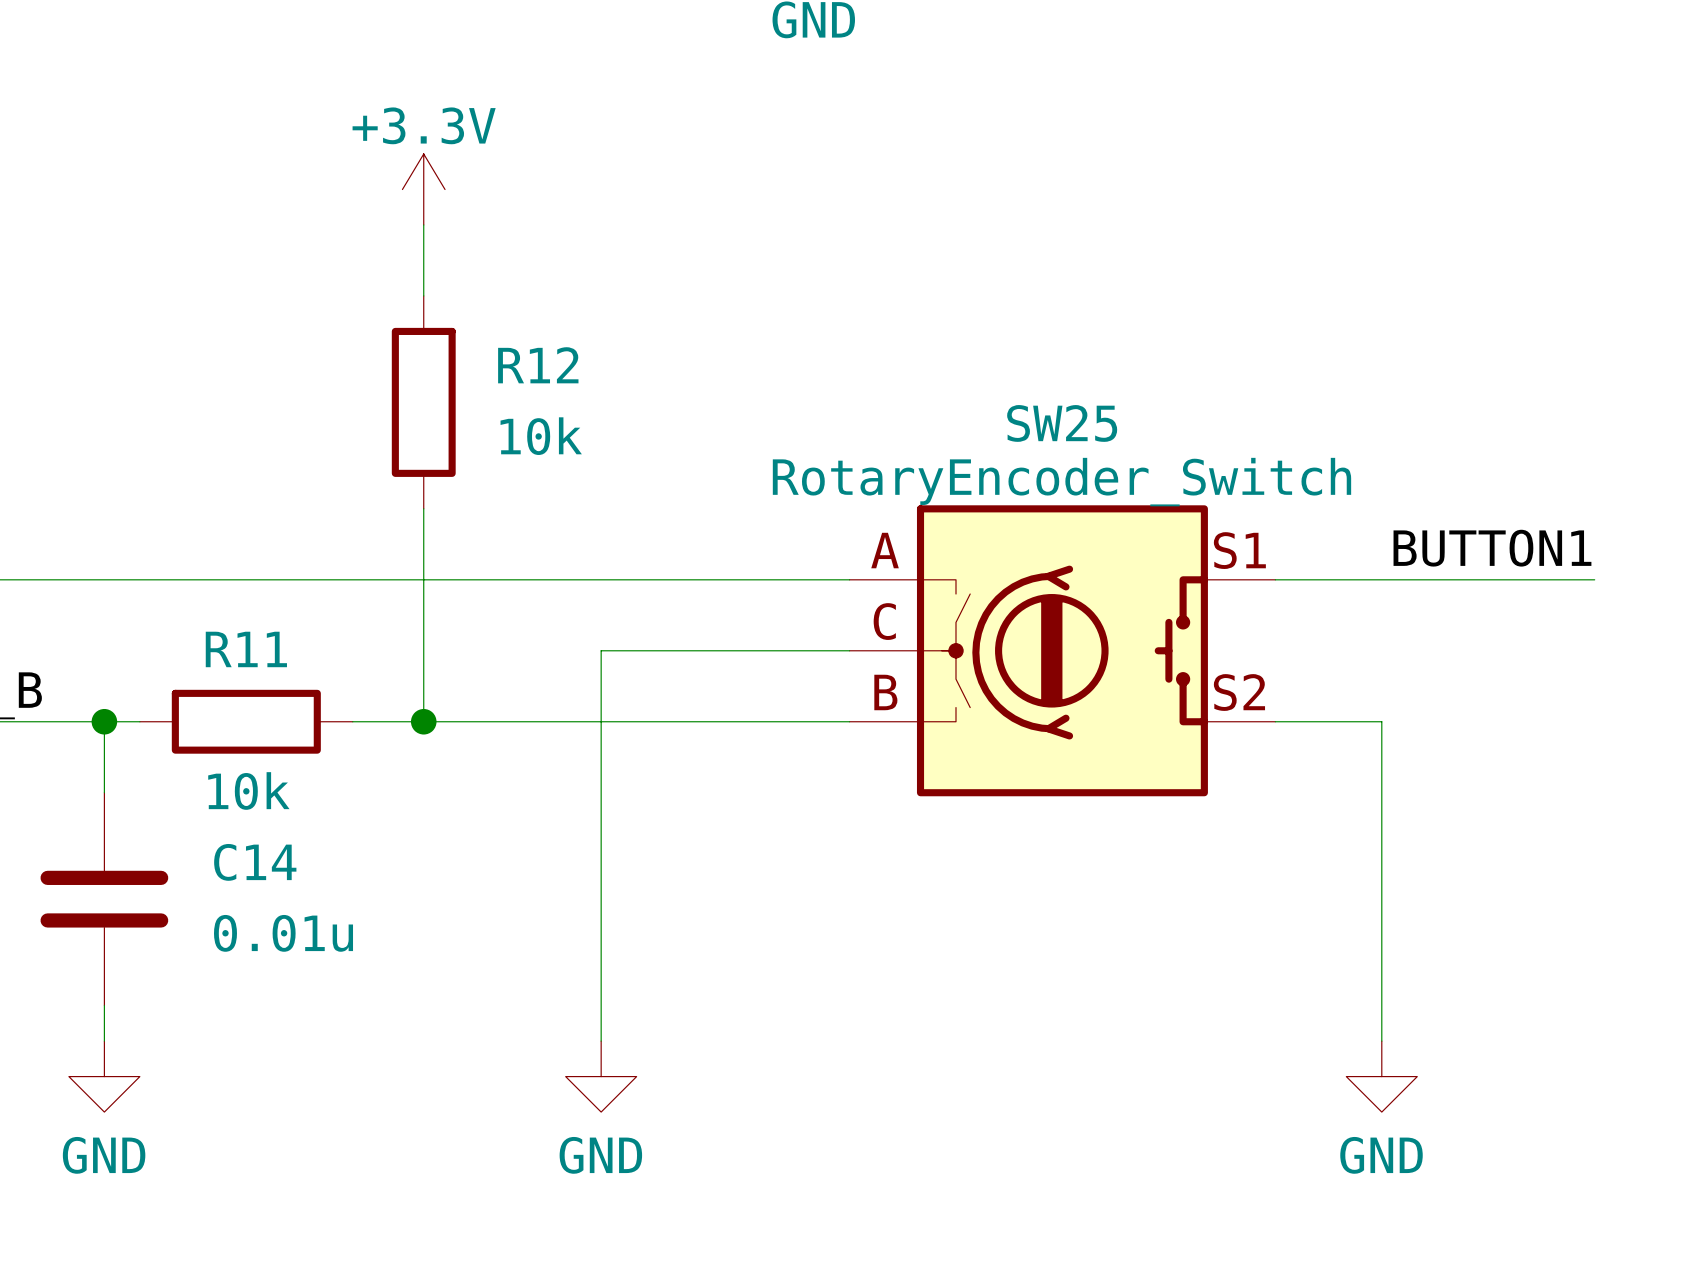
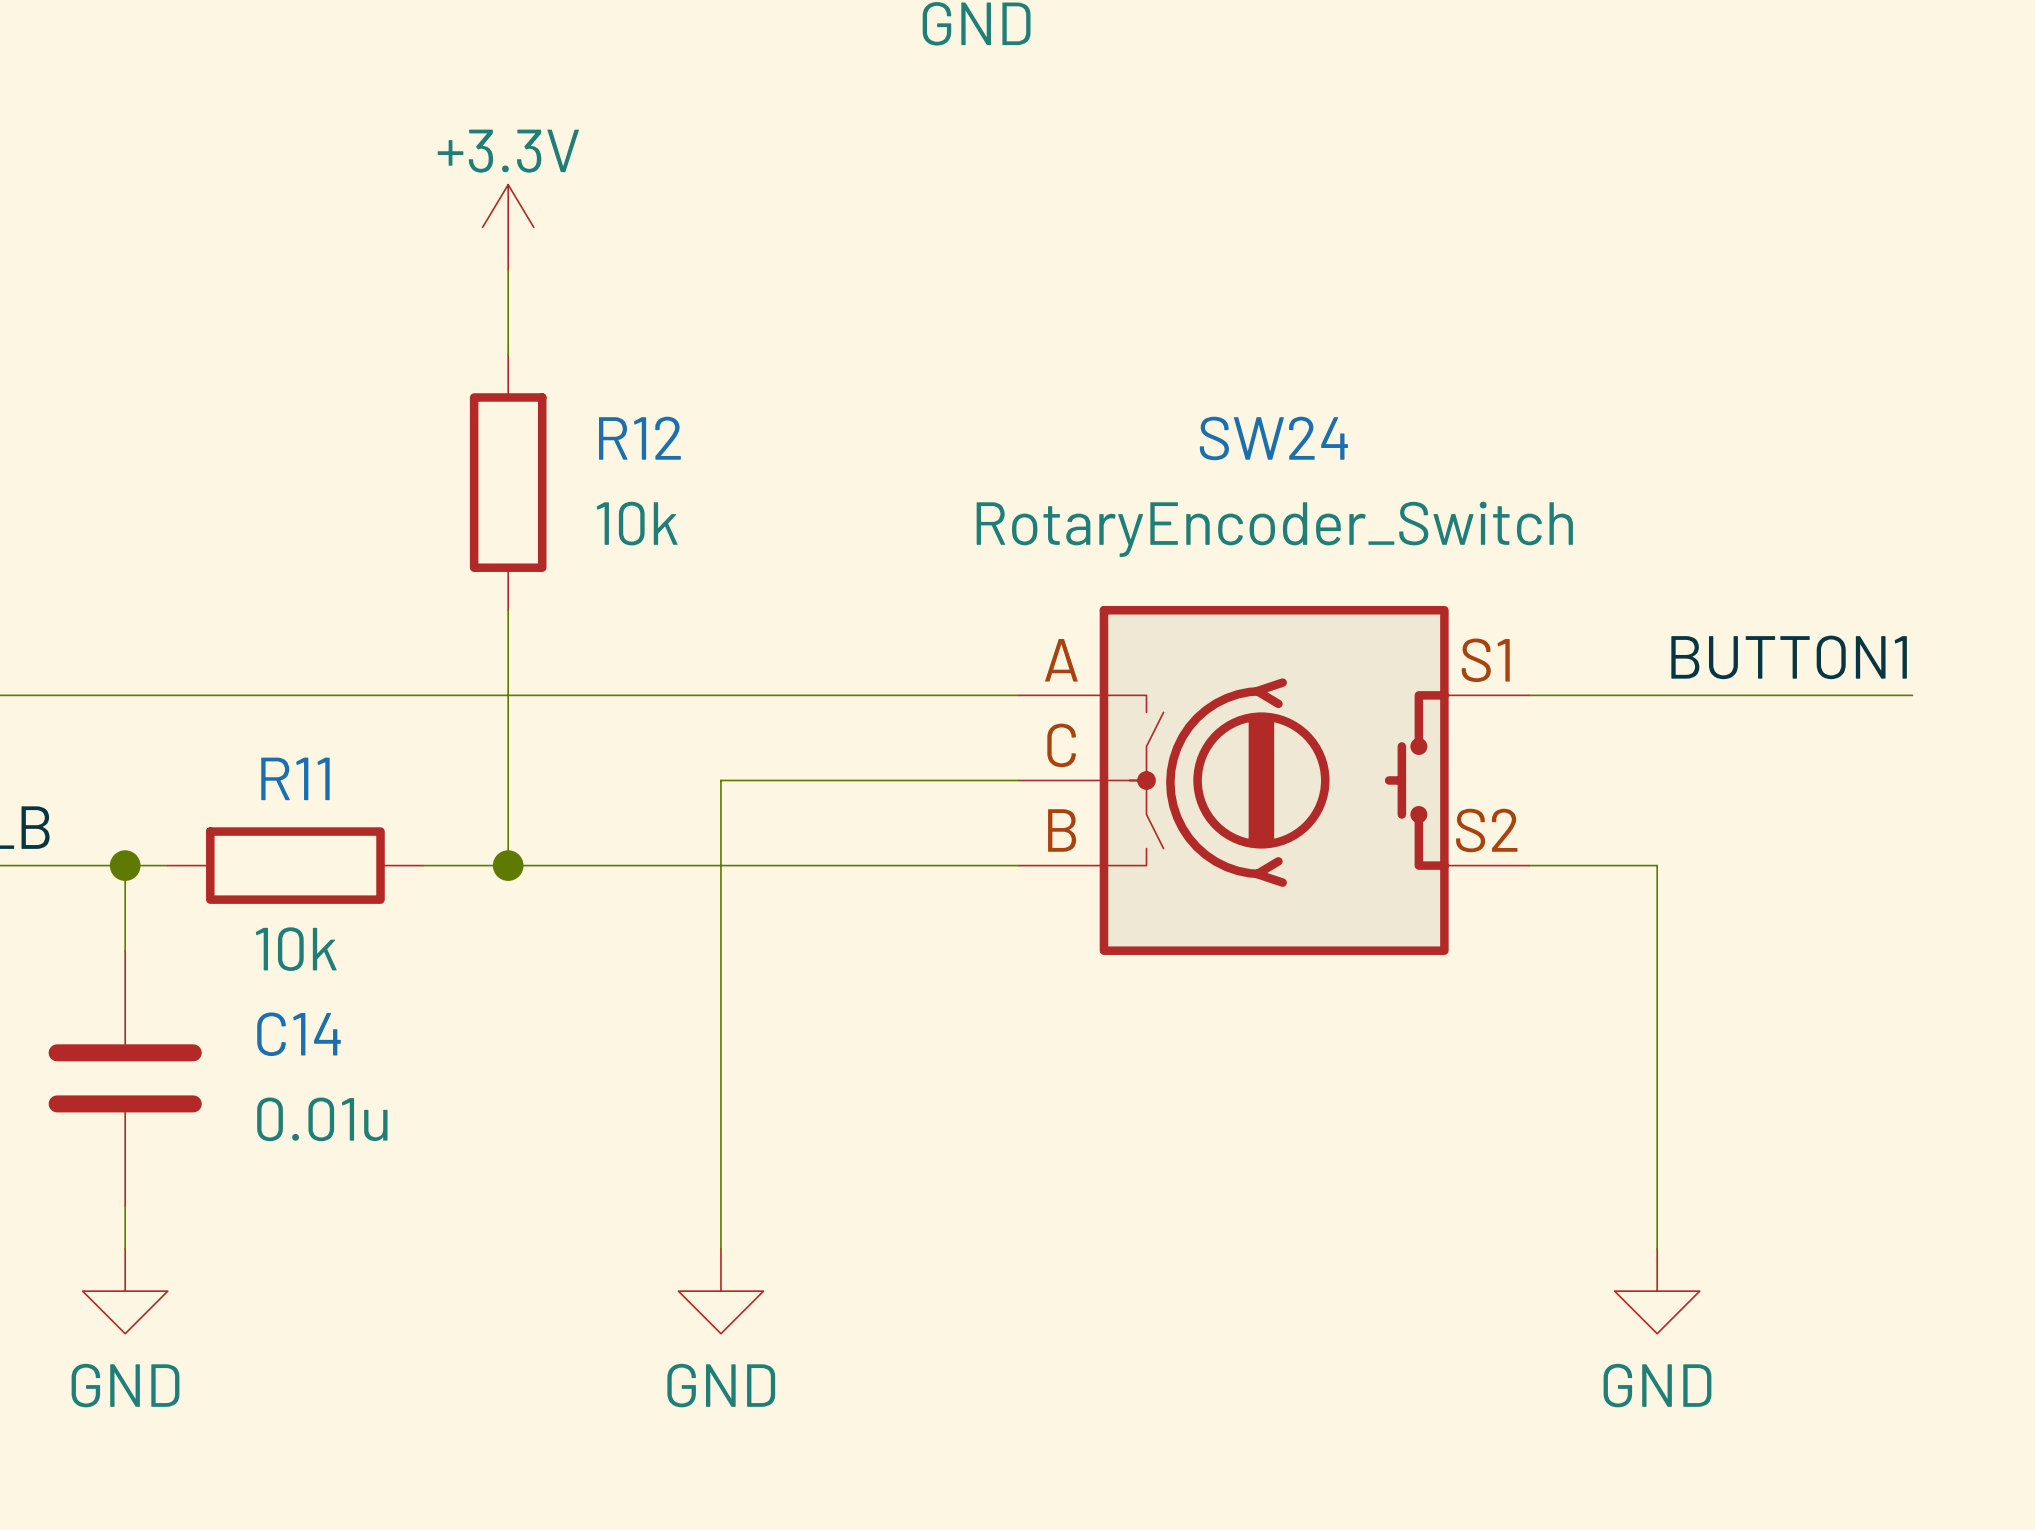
SW25 name: SW25 (1062, 423) -> SW24 (1273, 438)
SW25 value position: RotaryEncoder_Switch (1061, 482) -> RotaryEncoder_Switch (1274, 529)

